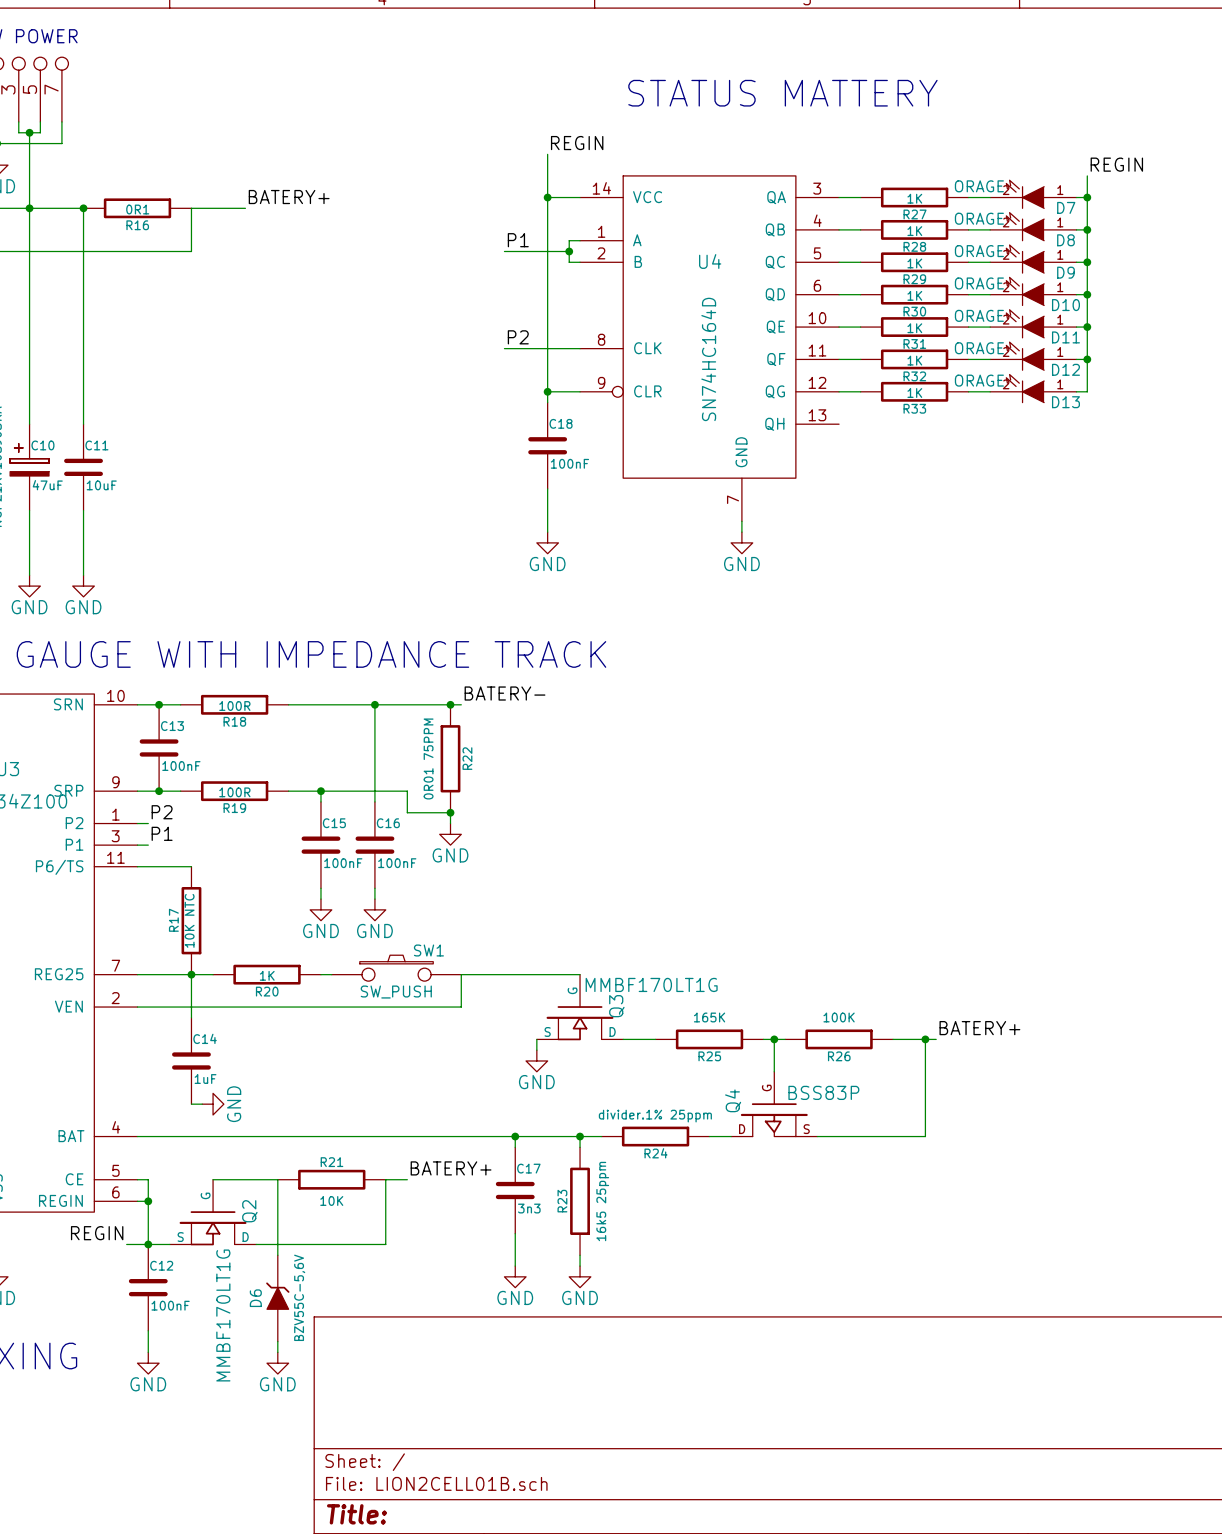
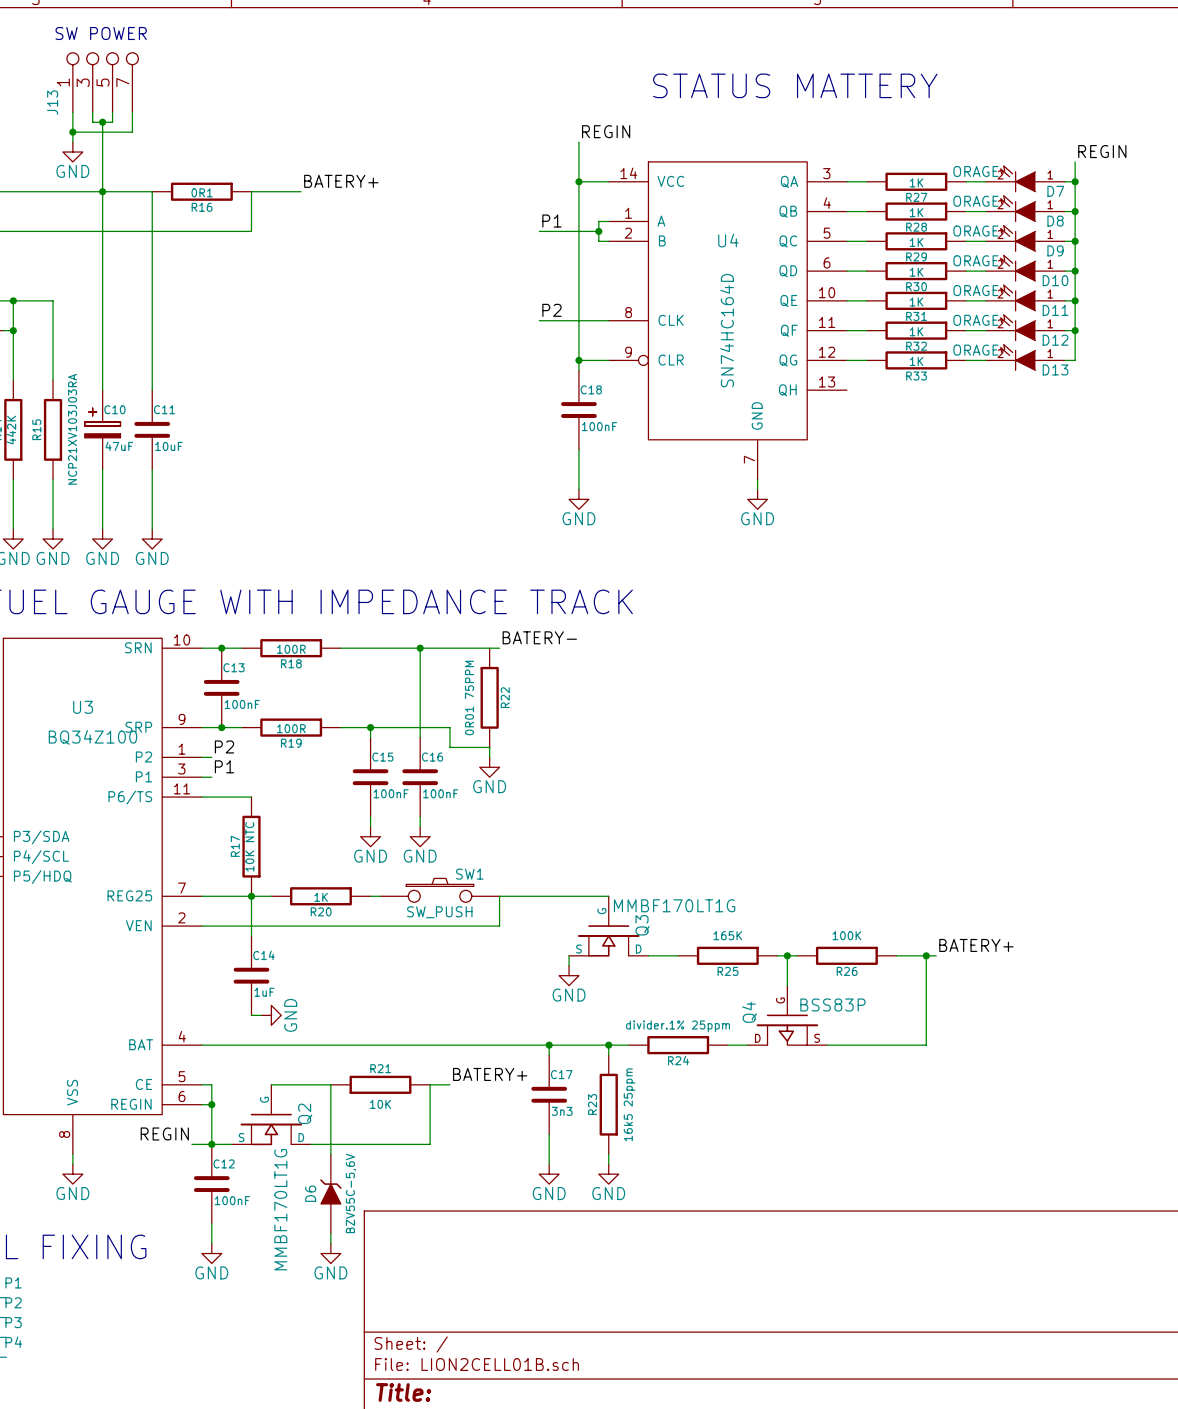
junction: (83, 208) -> none
junction: (450, 704) -> none
junction: (450, 812) -> none

